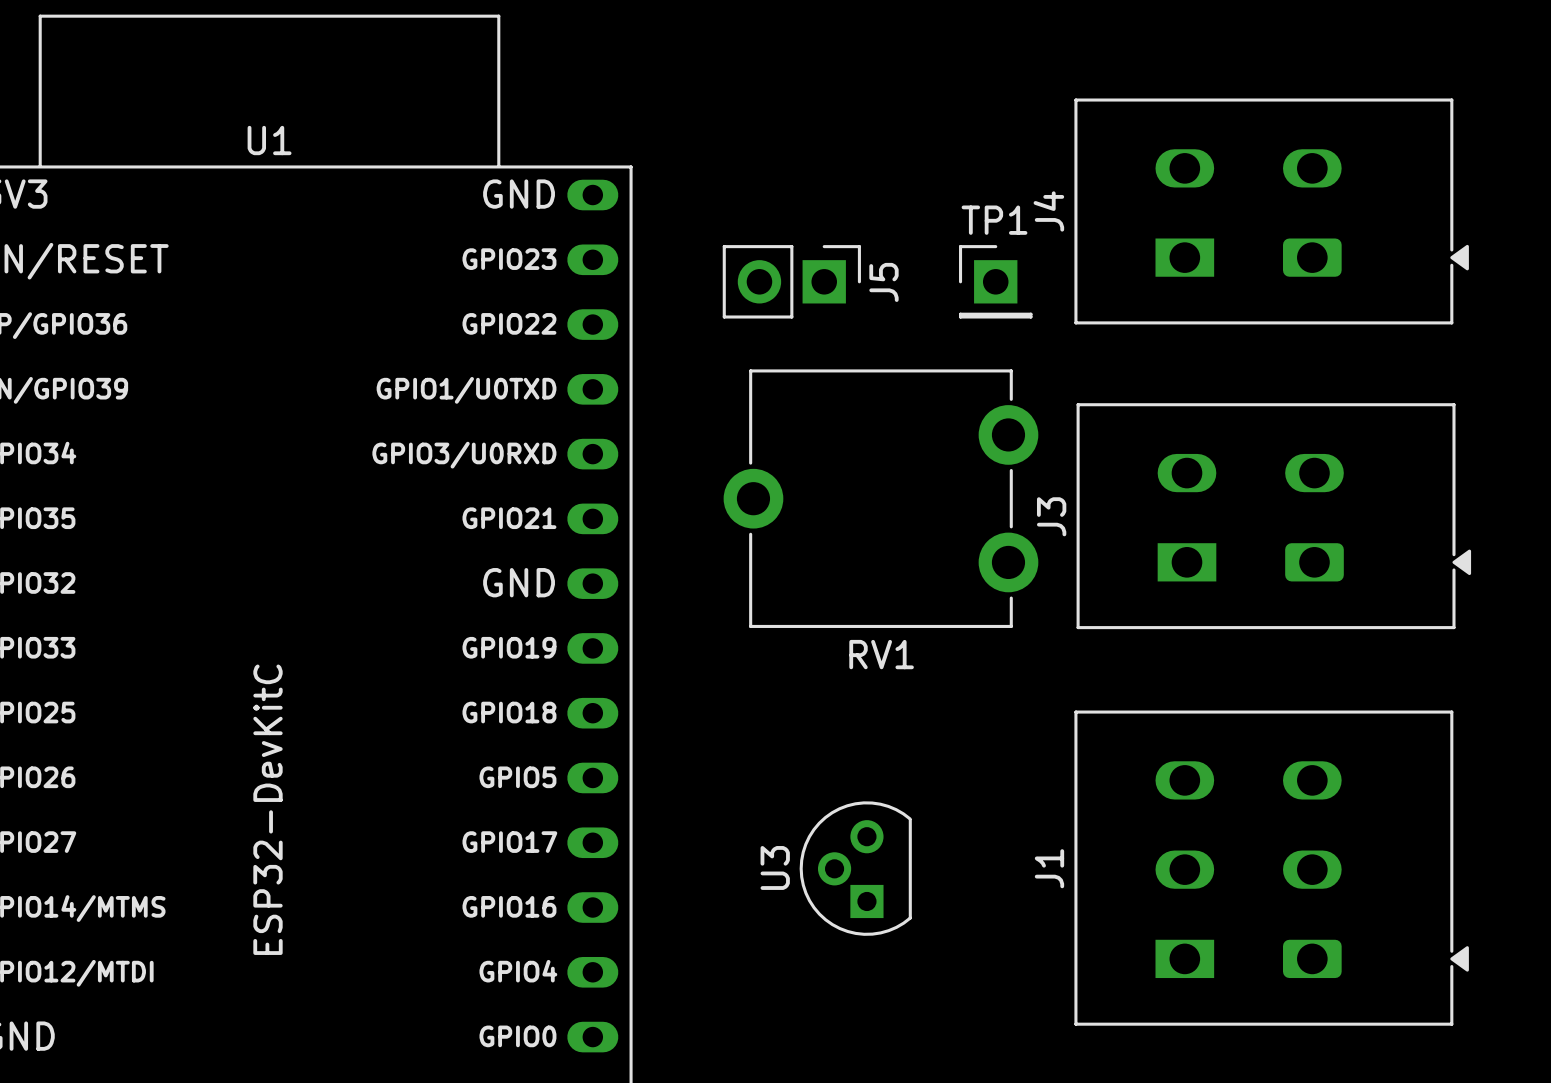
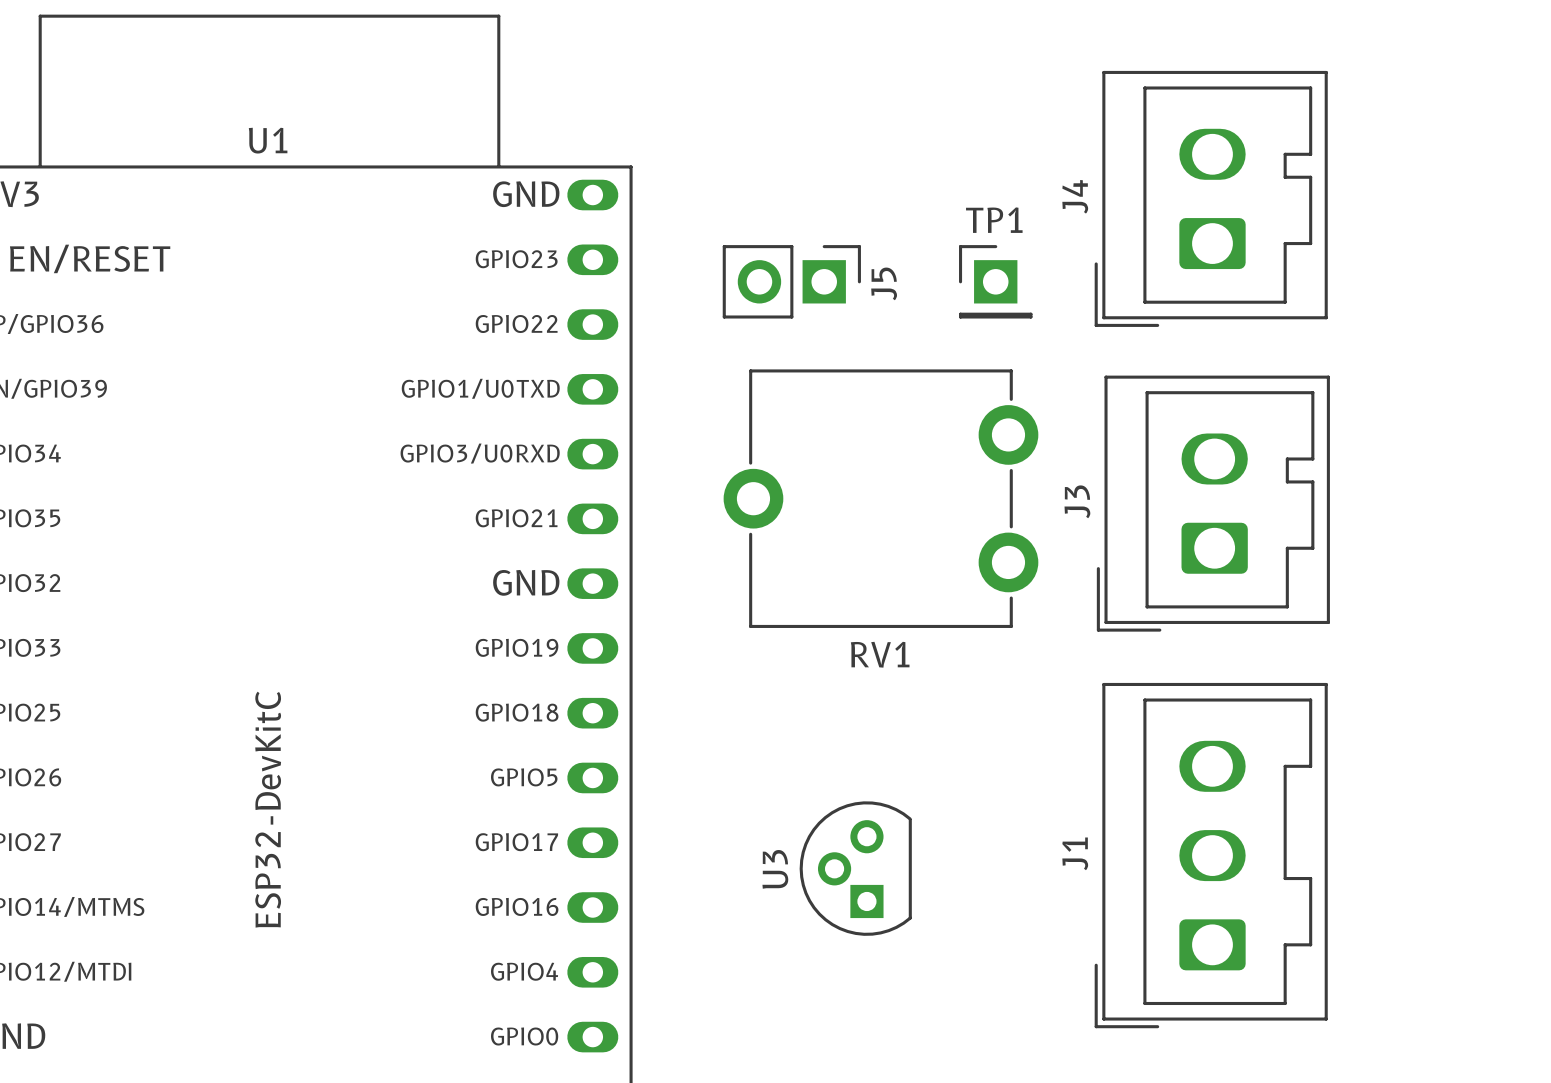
J4 footprint: [1074, 98, 1469, 325] -> [1094, 70, 1328, 327]
J4 name position: J4 (1048, 211) -> J4 (1075, 196)
J3 footprint: [1076, 403, 1472, 630] -> [1096, 375, 1330, 632]
J3 name position: J3 (1051, 516) -> J3 (1077, 501)
J1 footprint: [1074, 710, 1469, 1026] -> [1094, 682, 1328, 1029]
J1 name position: J1 (1049, 868) -> J1 (1075, 853)

